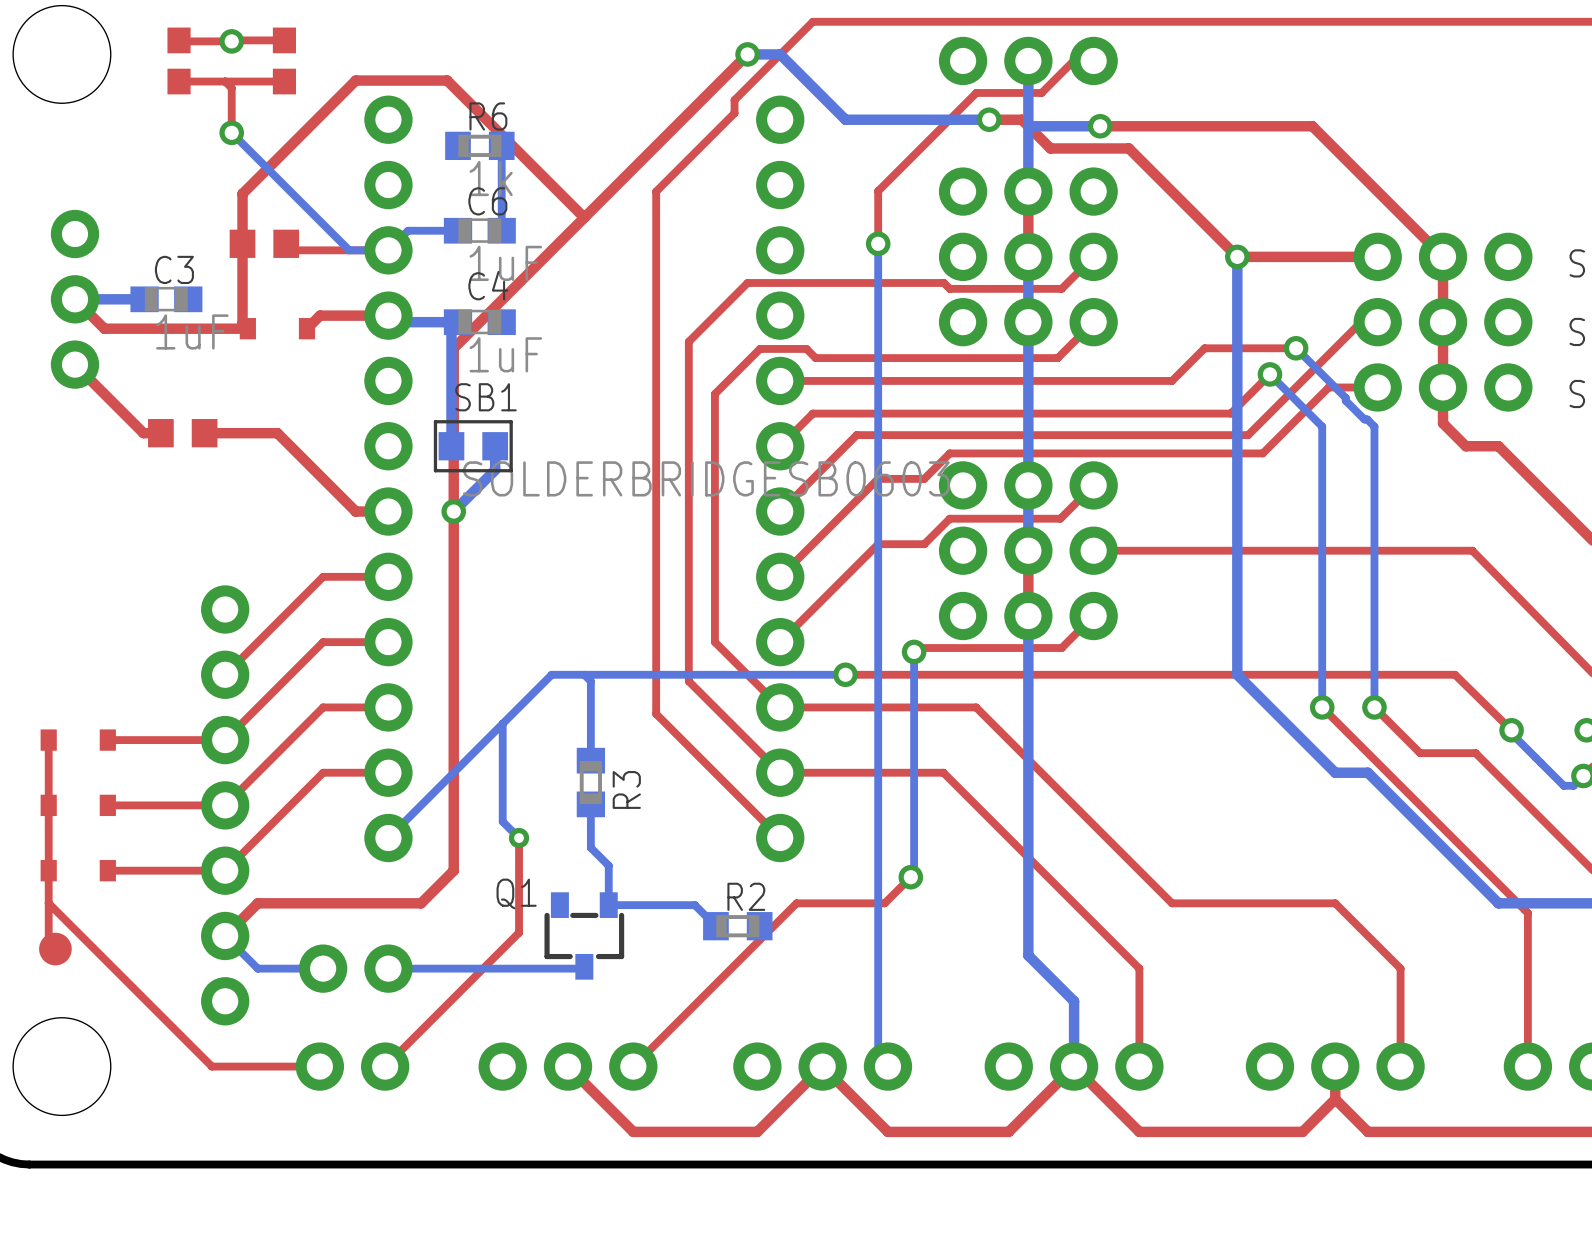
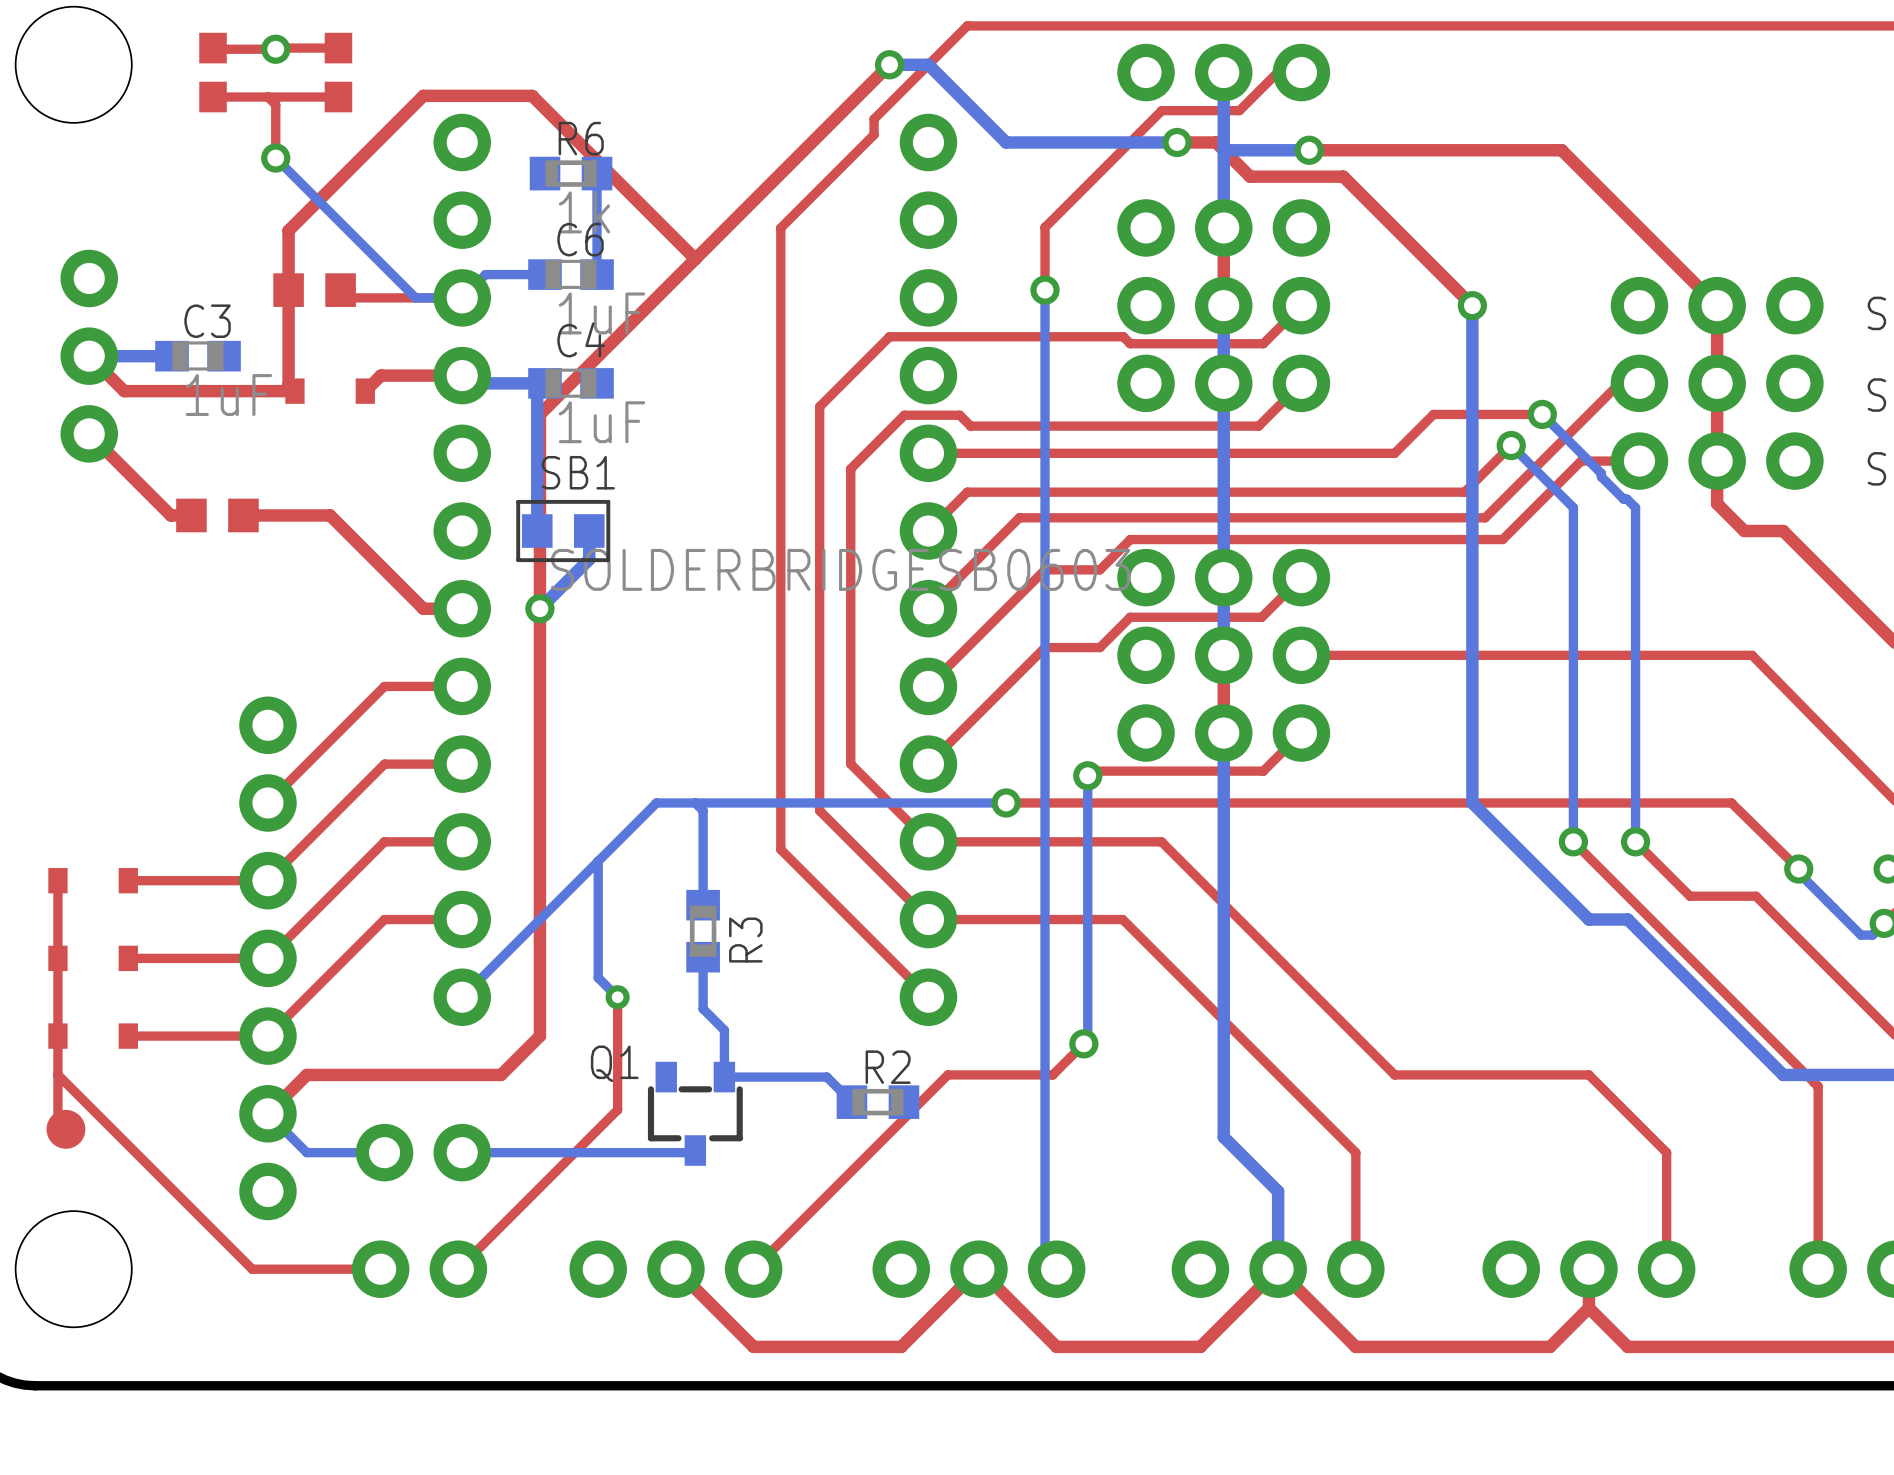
top track: (1377, 256) (1237, 256) -> none

